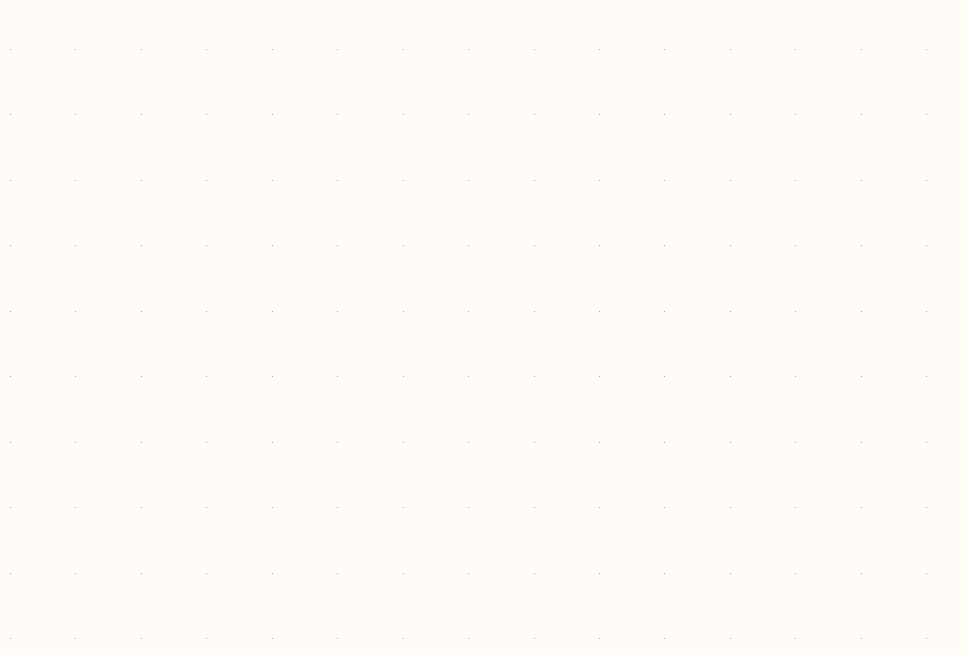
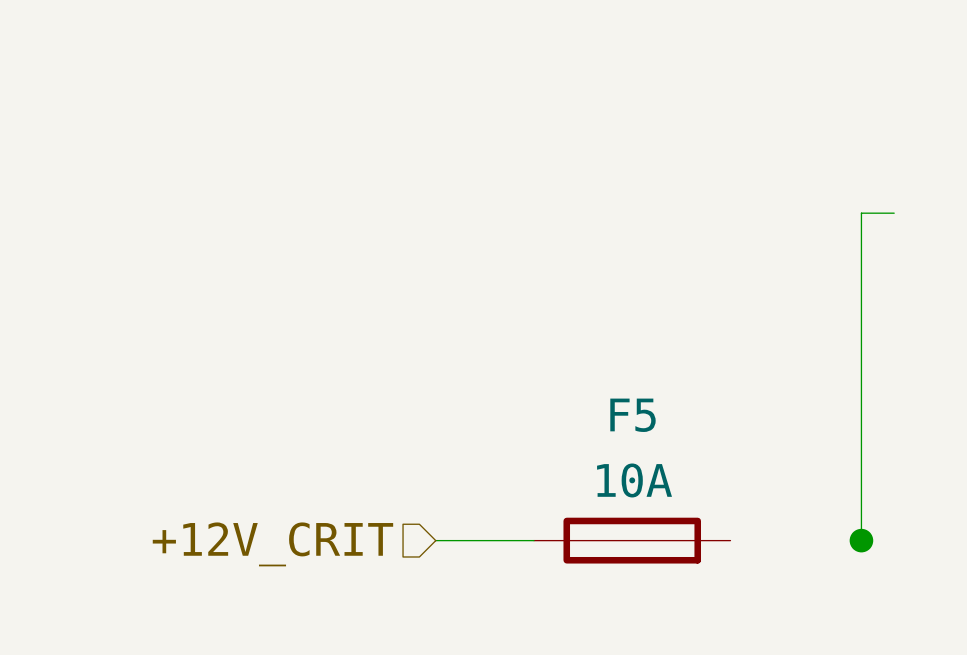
wire: none -> (894, 213) (861, 213) (861, 540)
wire: none -> (435, 540) (534, 540)
F5: none -> 10A (632, 540)
junction: none -> (861, 540)
hierarchical label: none -> +12V_CRIT (272, 544)

